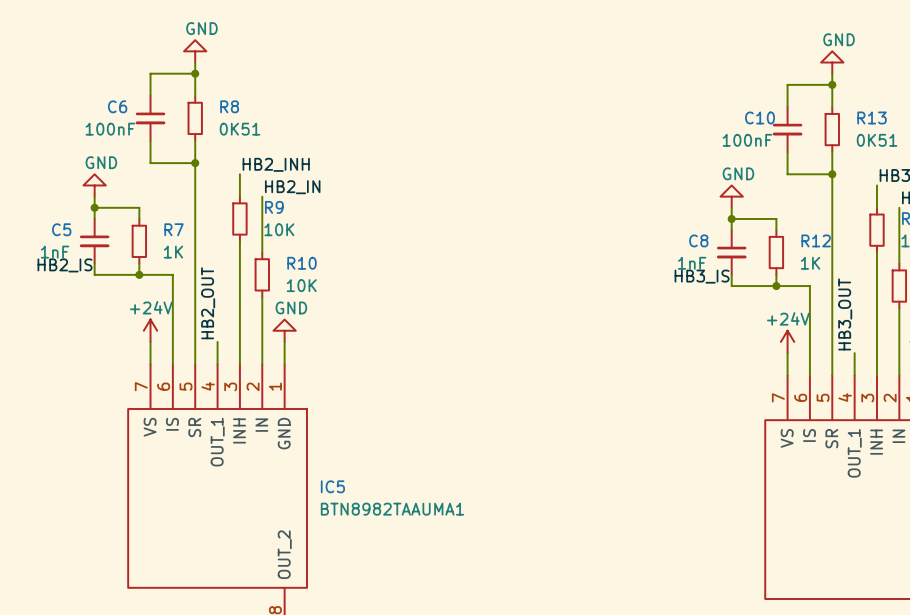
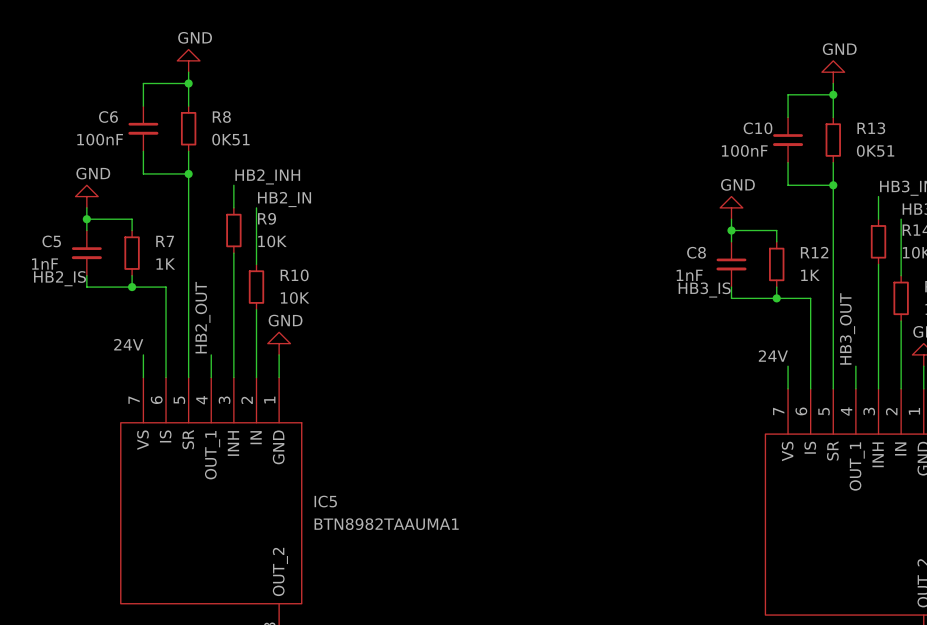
power symbol: +24V (150, 330) -> none
label: none -> 24V (128, 344)
power symbol: +24V (787, 341) -> none
label: none -> 24V (773, 356)

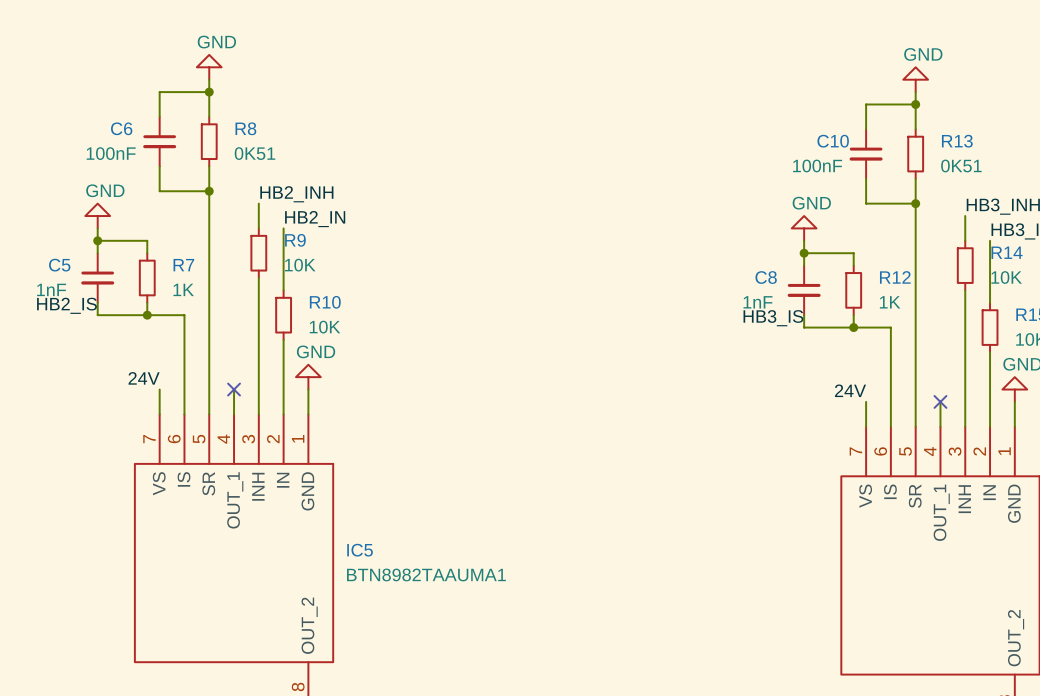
label: HB2_OUT (202, 317) -> none
label: HB3_OUT (847, 328) -> none
no-connect mark: none -> (234, 389)
no-connect mark: none -> (940, 401)

